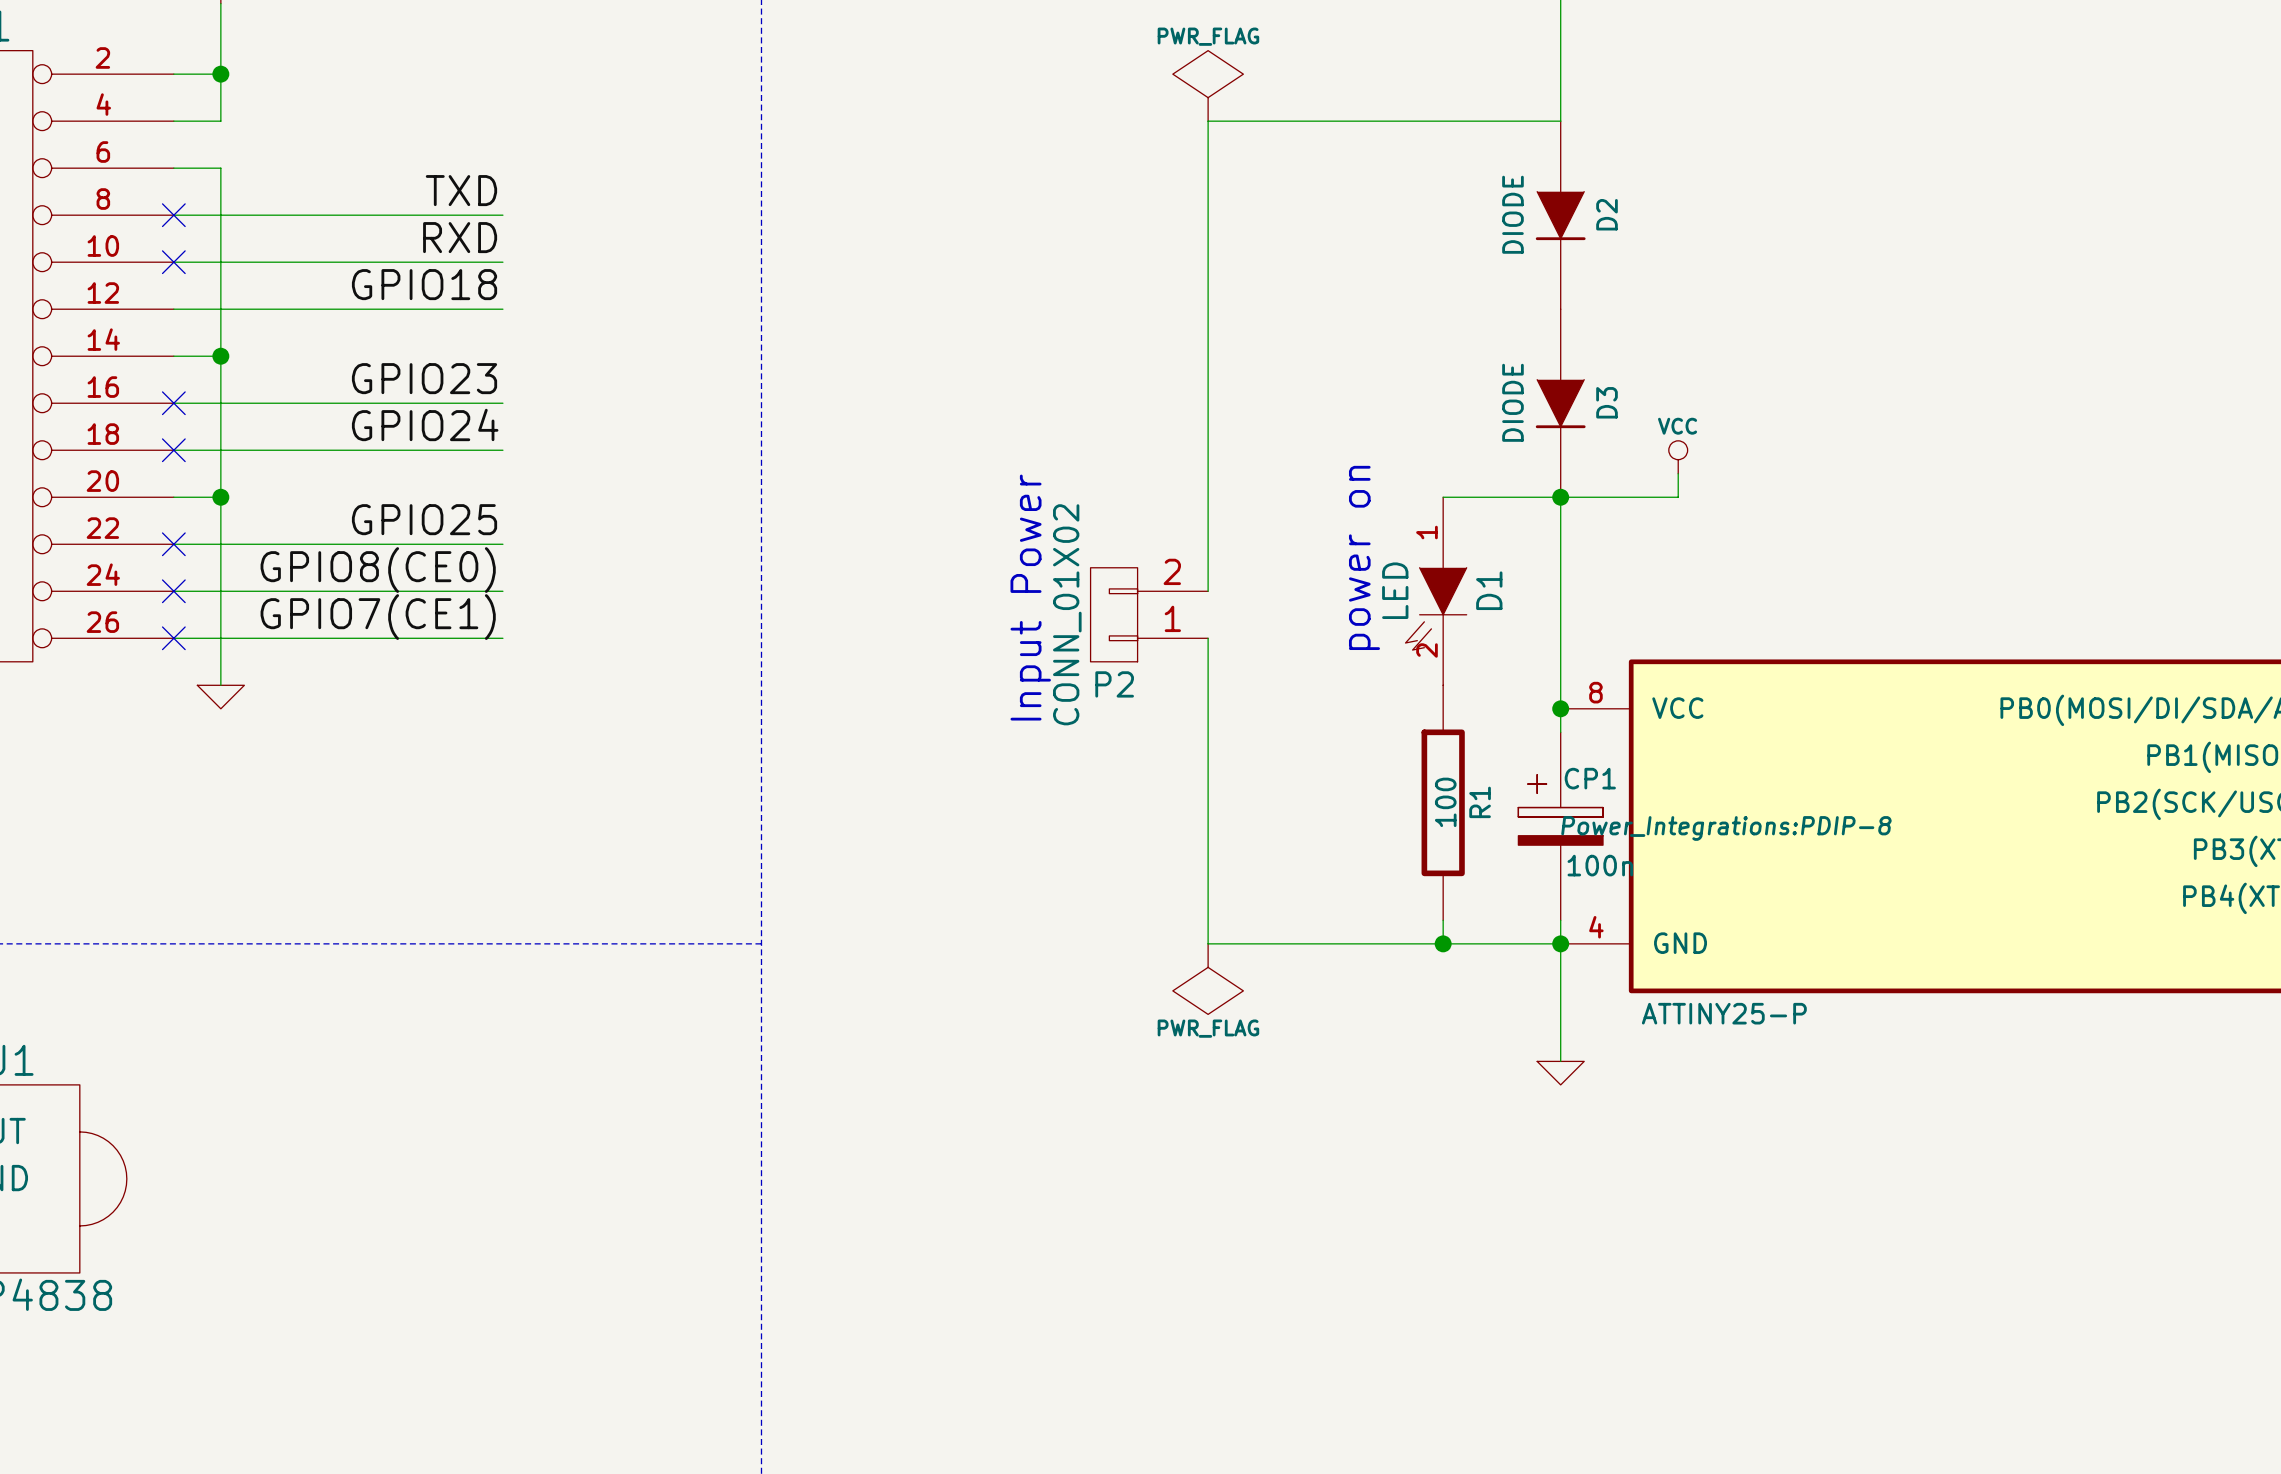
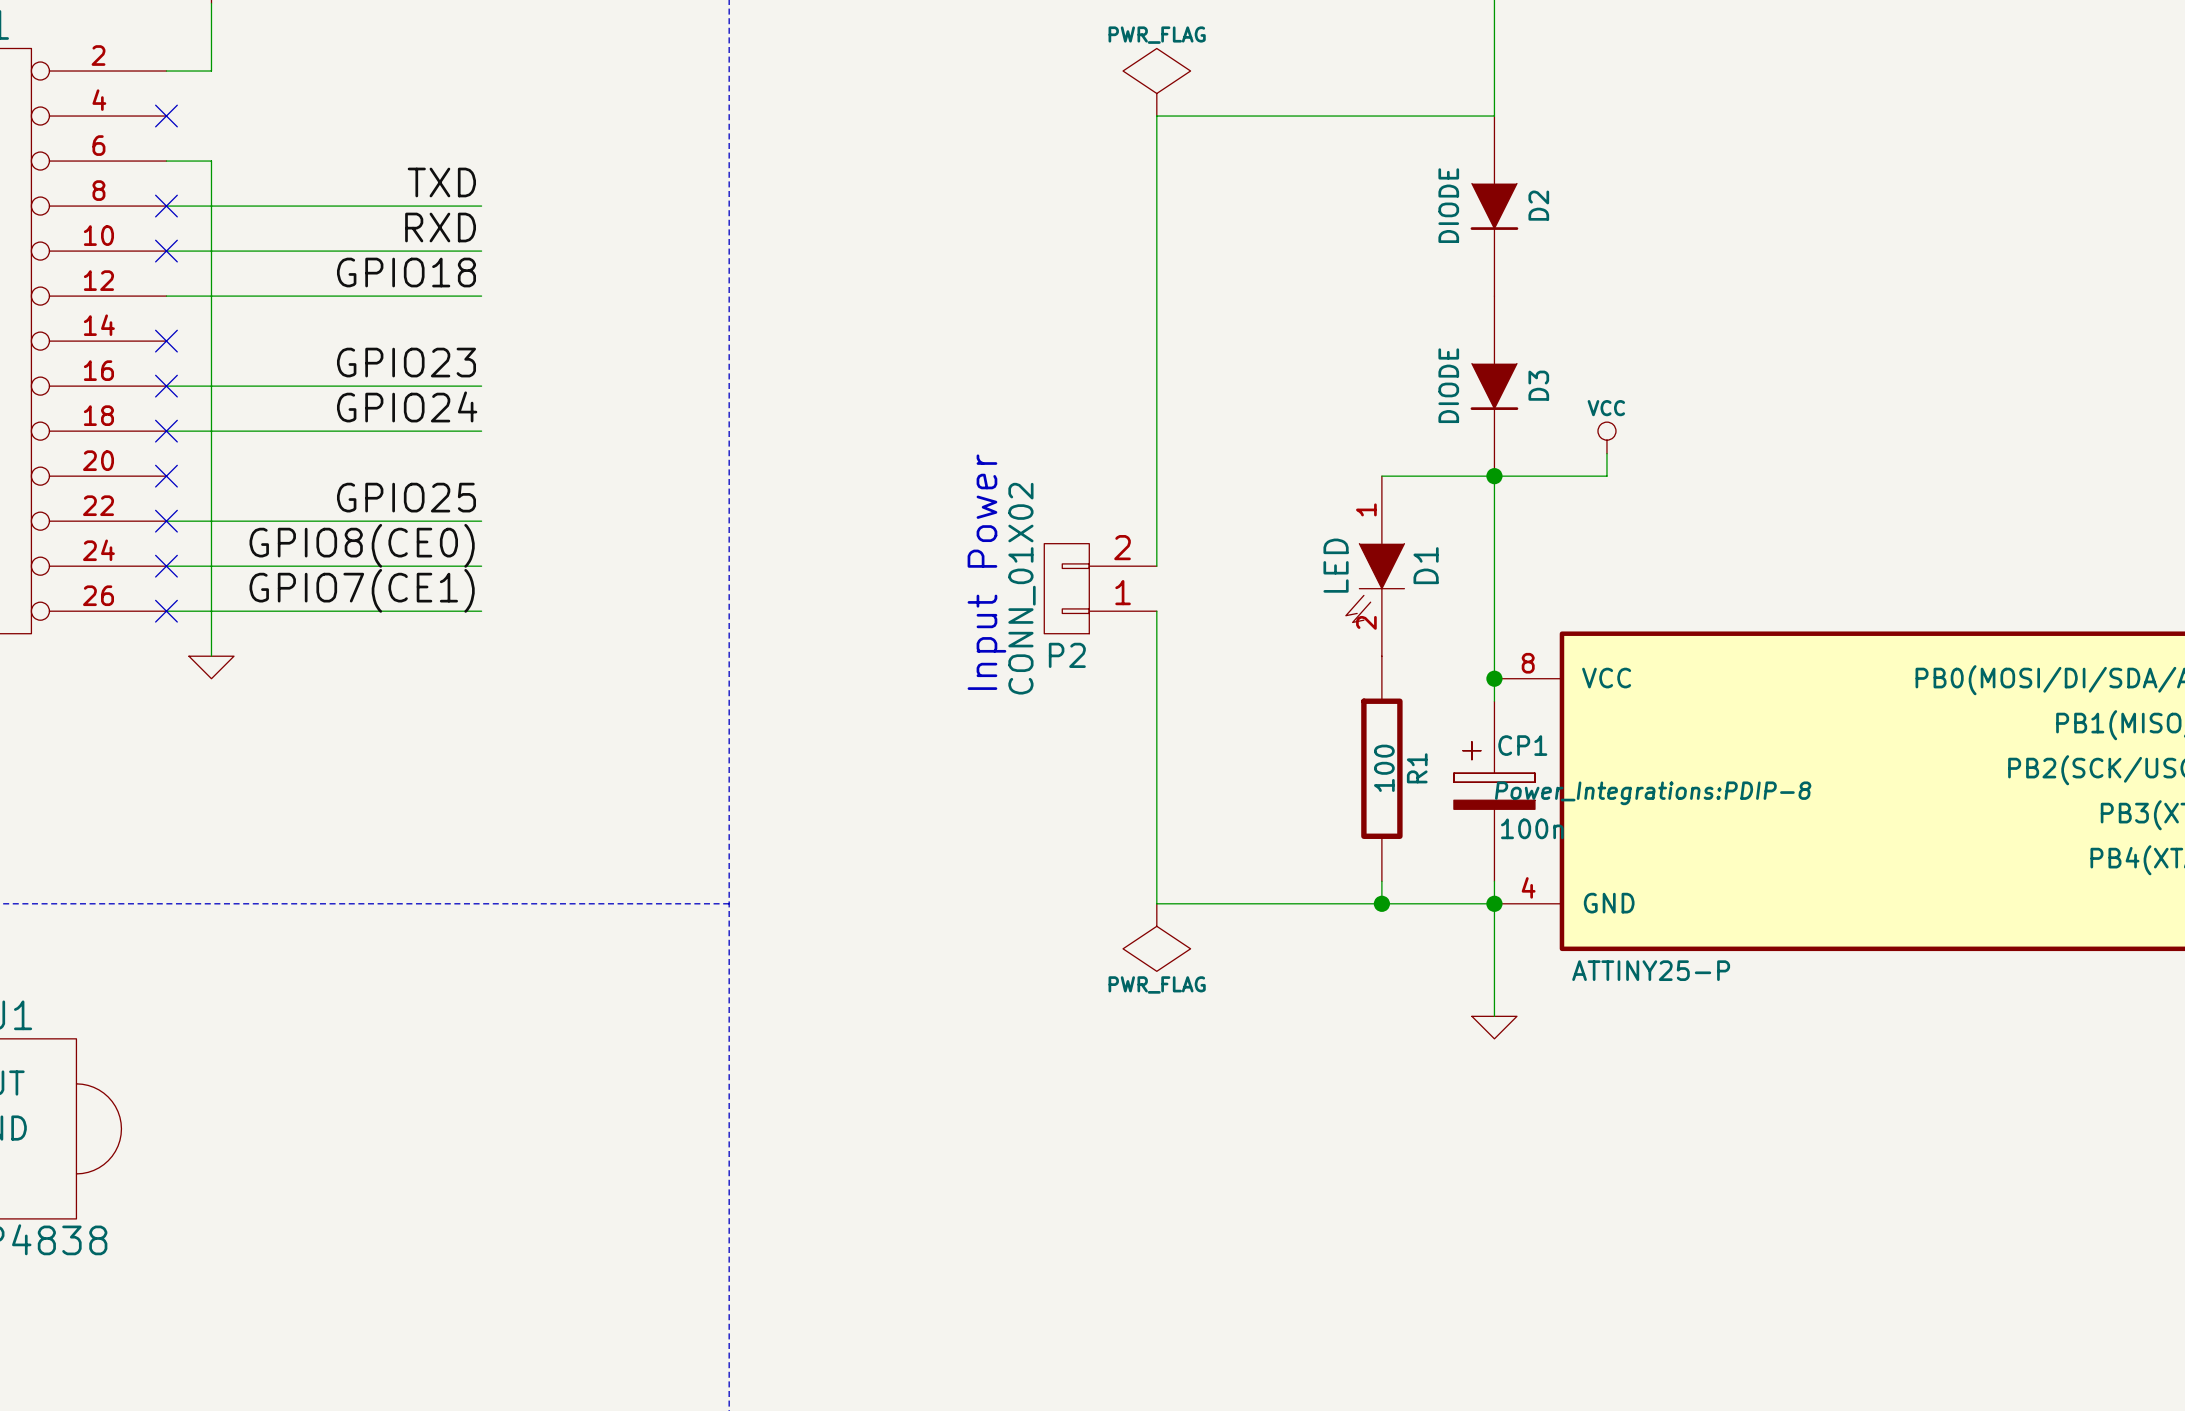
wire: (220, 74) (220, 121) (173, 121) -> none
junction: (220, 74) -> none
no-connect mark: none -> (166, 116)
wire: (173, 356) (220, 356) -> none
no-connect mark: none -> (166, 341)
junction: (220, 356) -> none
wire: (173, 497) (220, 497) -> none
no-connect mark: none -> (166, 476)
junction: (220, 497) -> none
text: power on (1364, 557) -> none

